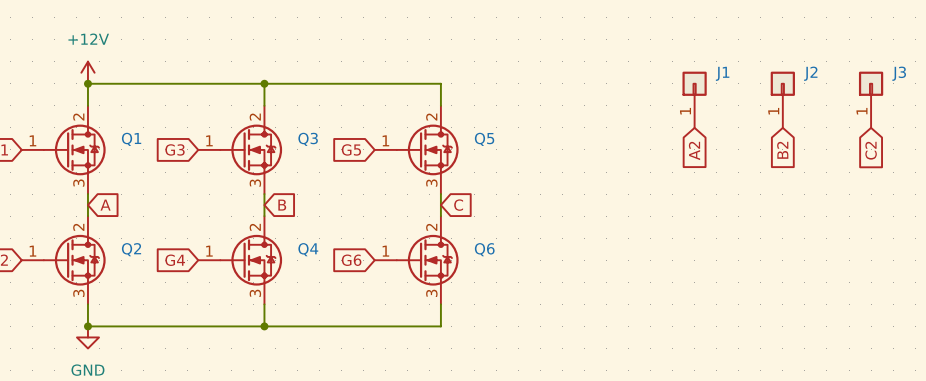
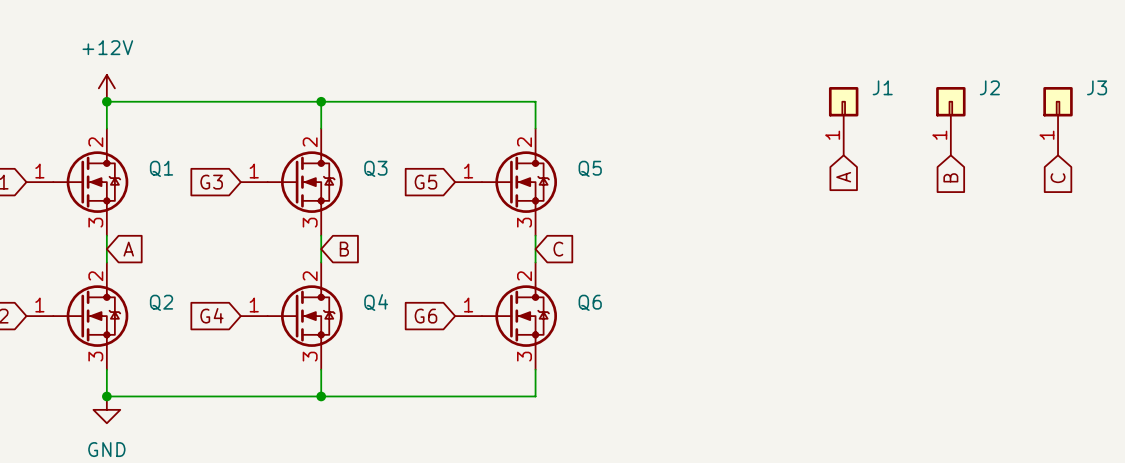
global label: A2 (694, 150) -> A (843, 177)
global label: B2 (782, 150) -> B (950, 177)
global label: C2 (871, 150) -> C (1058, 178)

